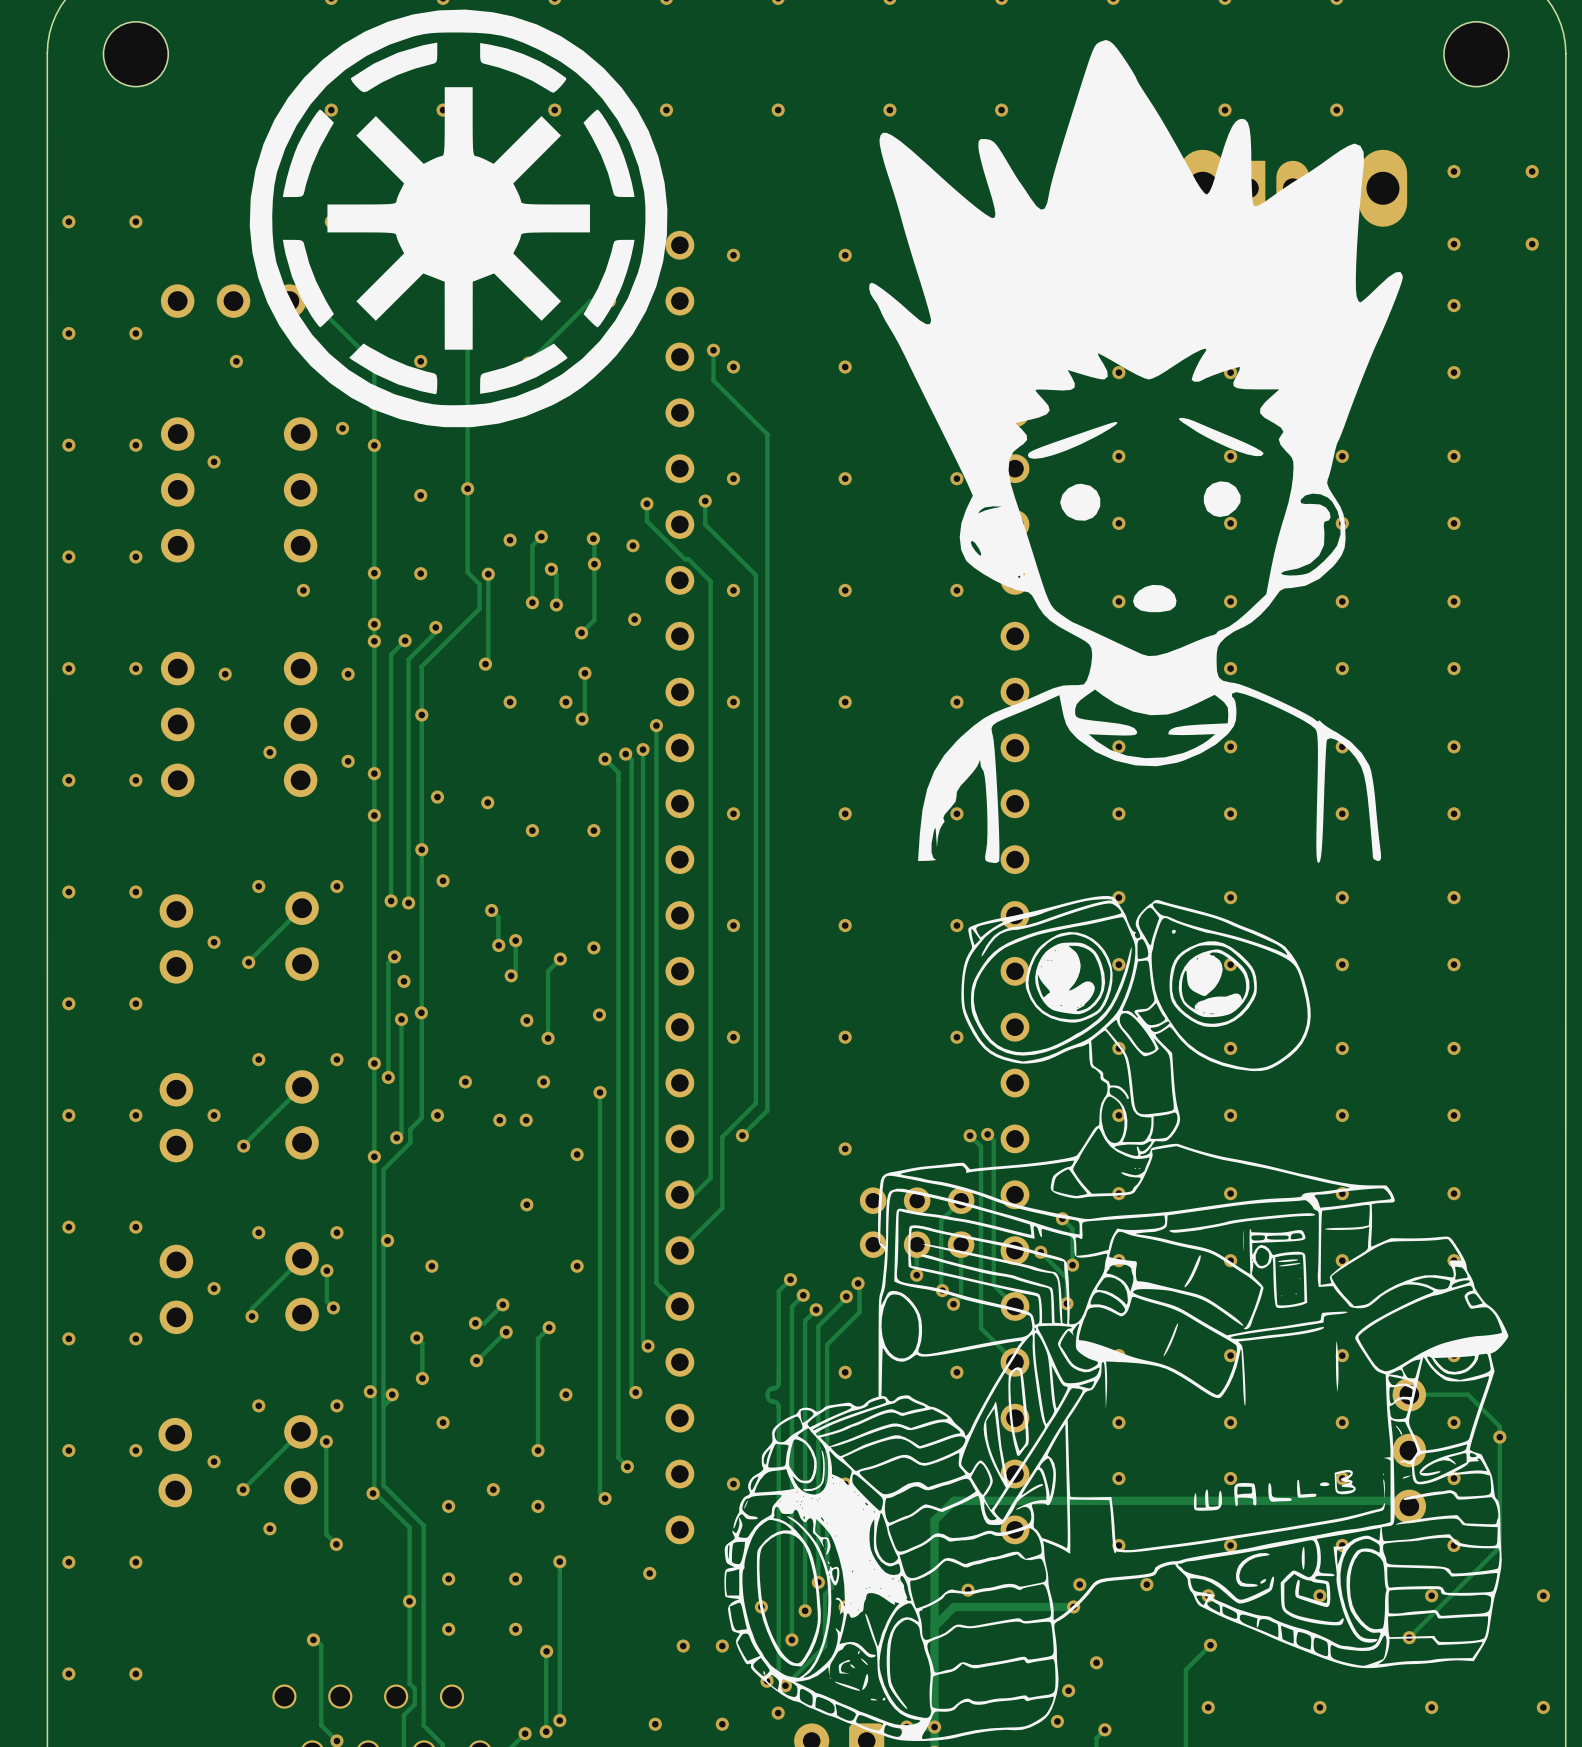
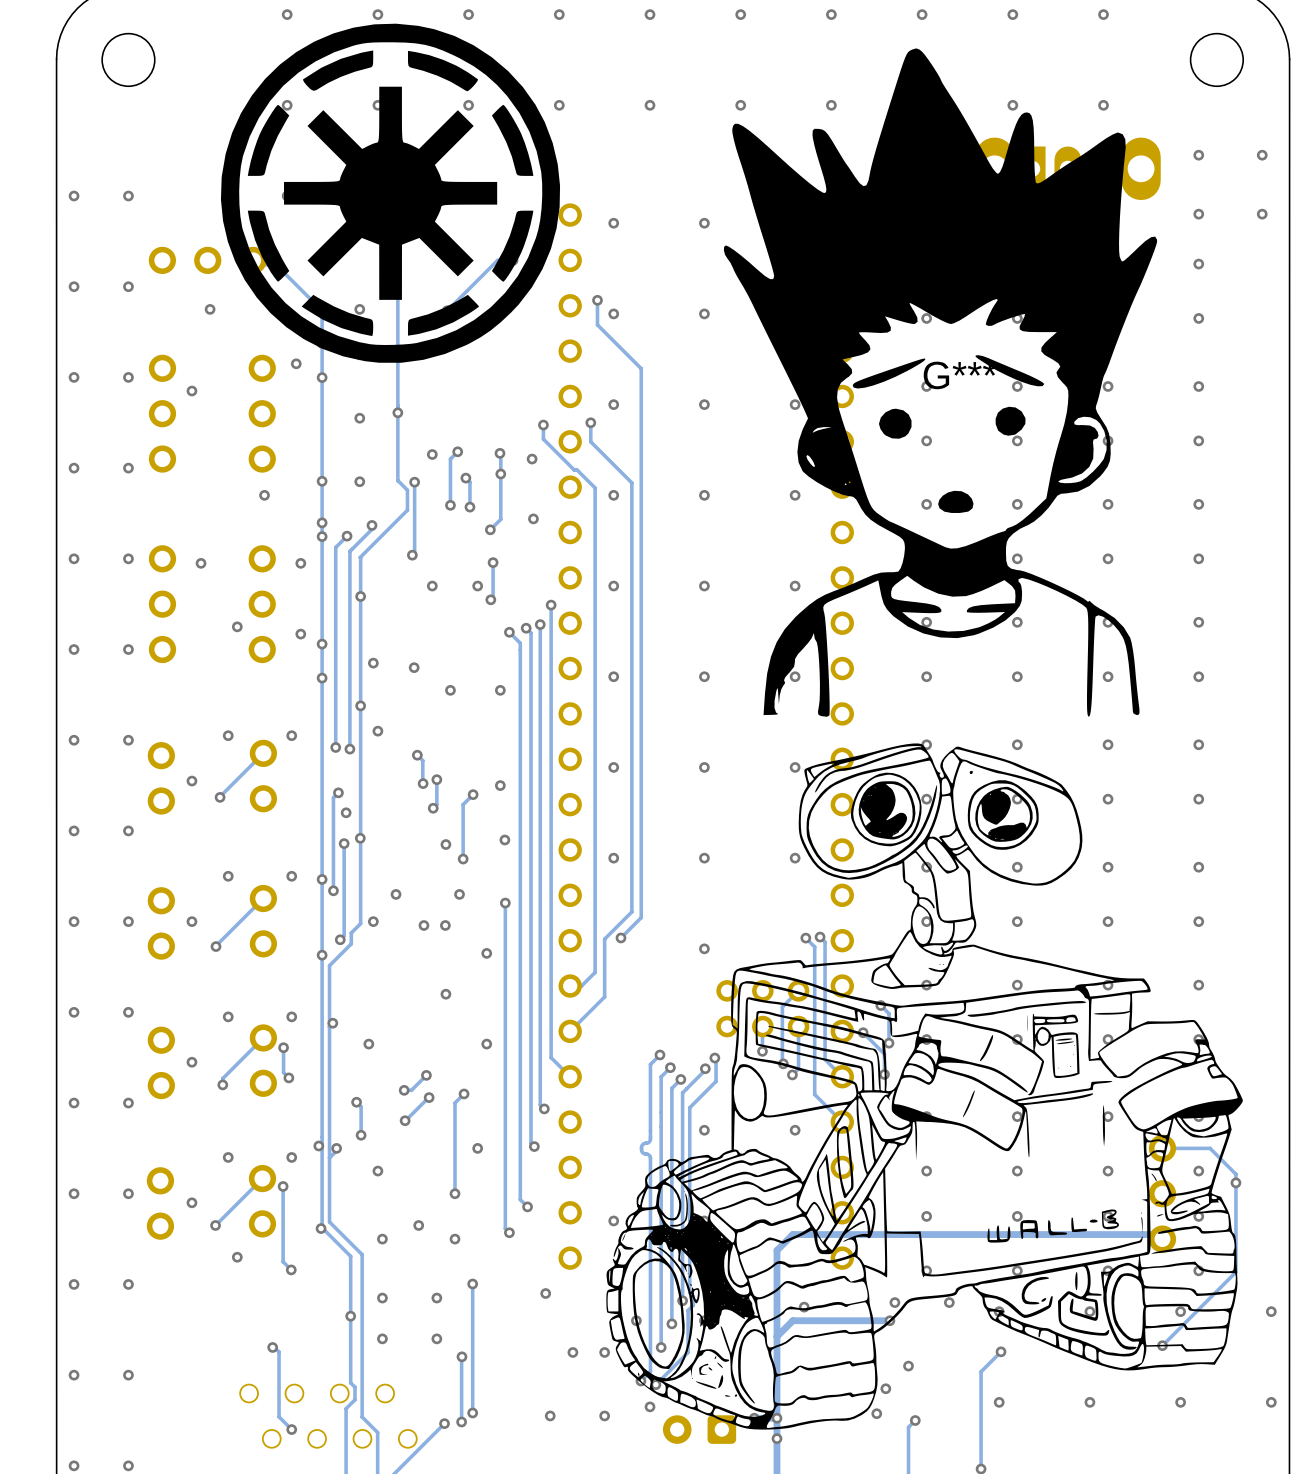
drawing: [869, 39, 1403, 864] -> none
G***: none -> (940, 382)

